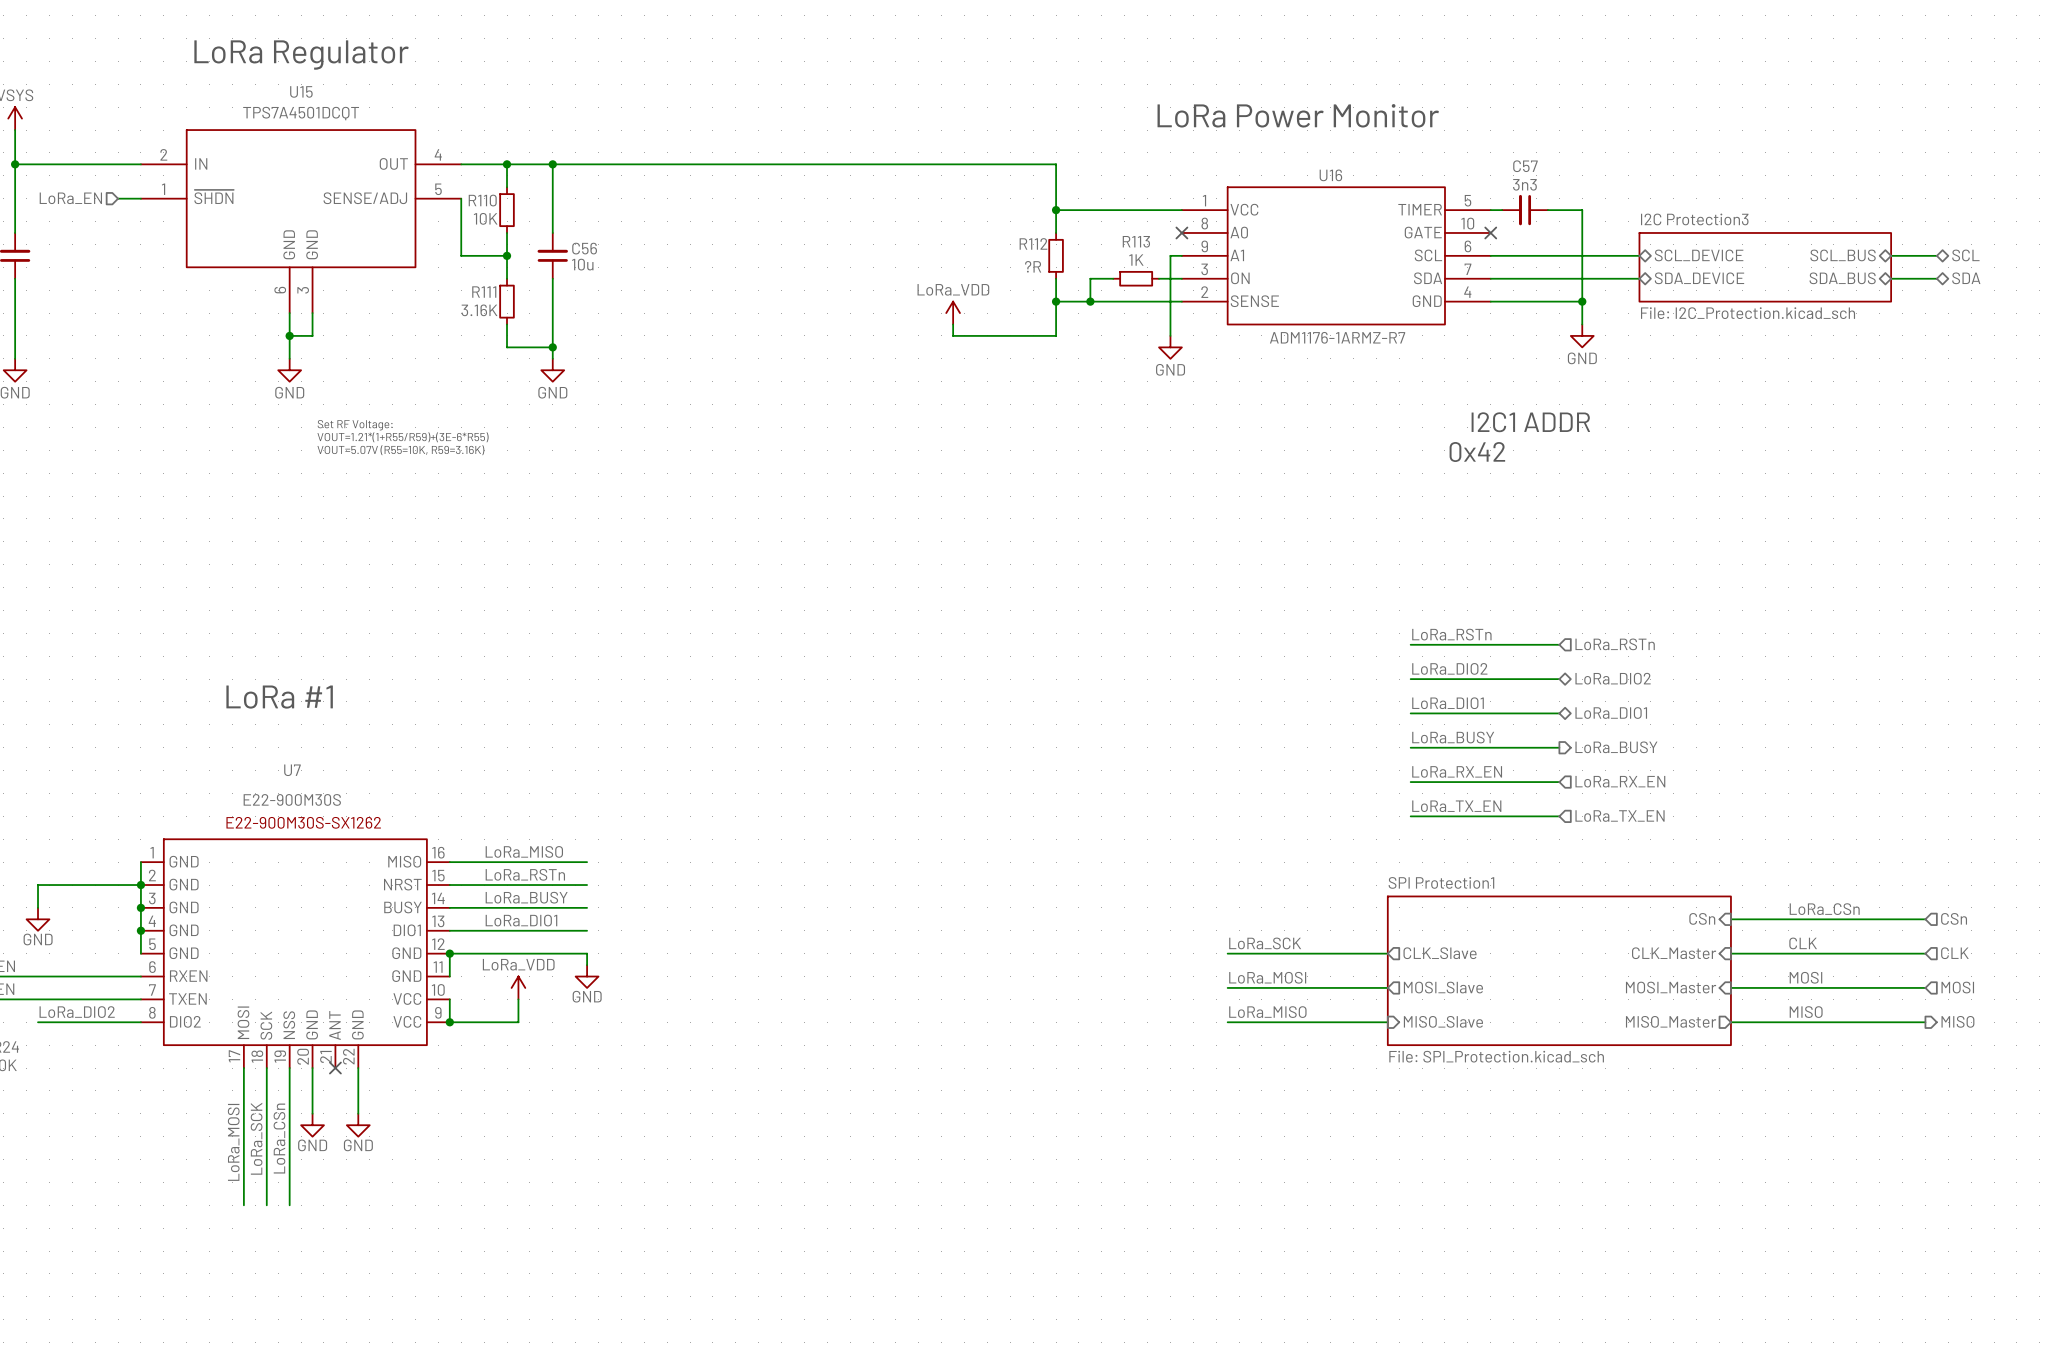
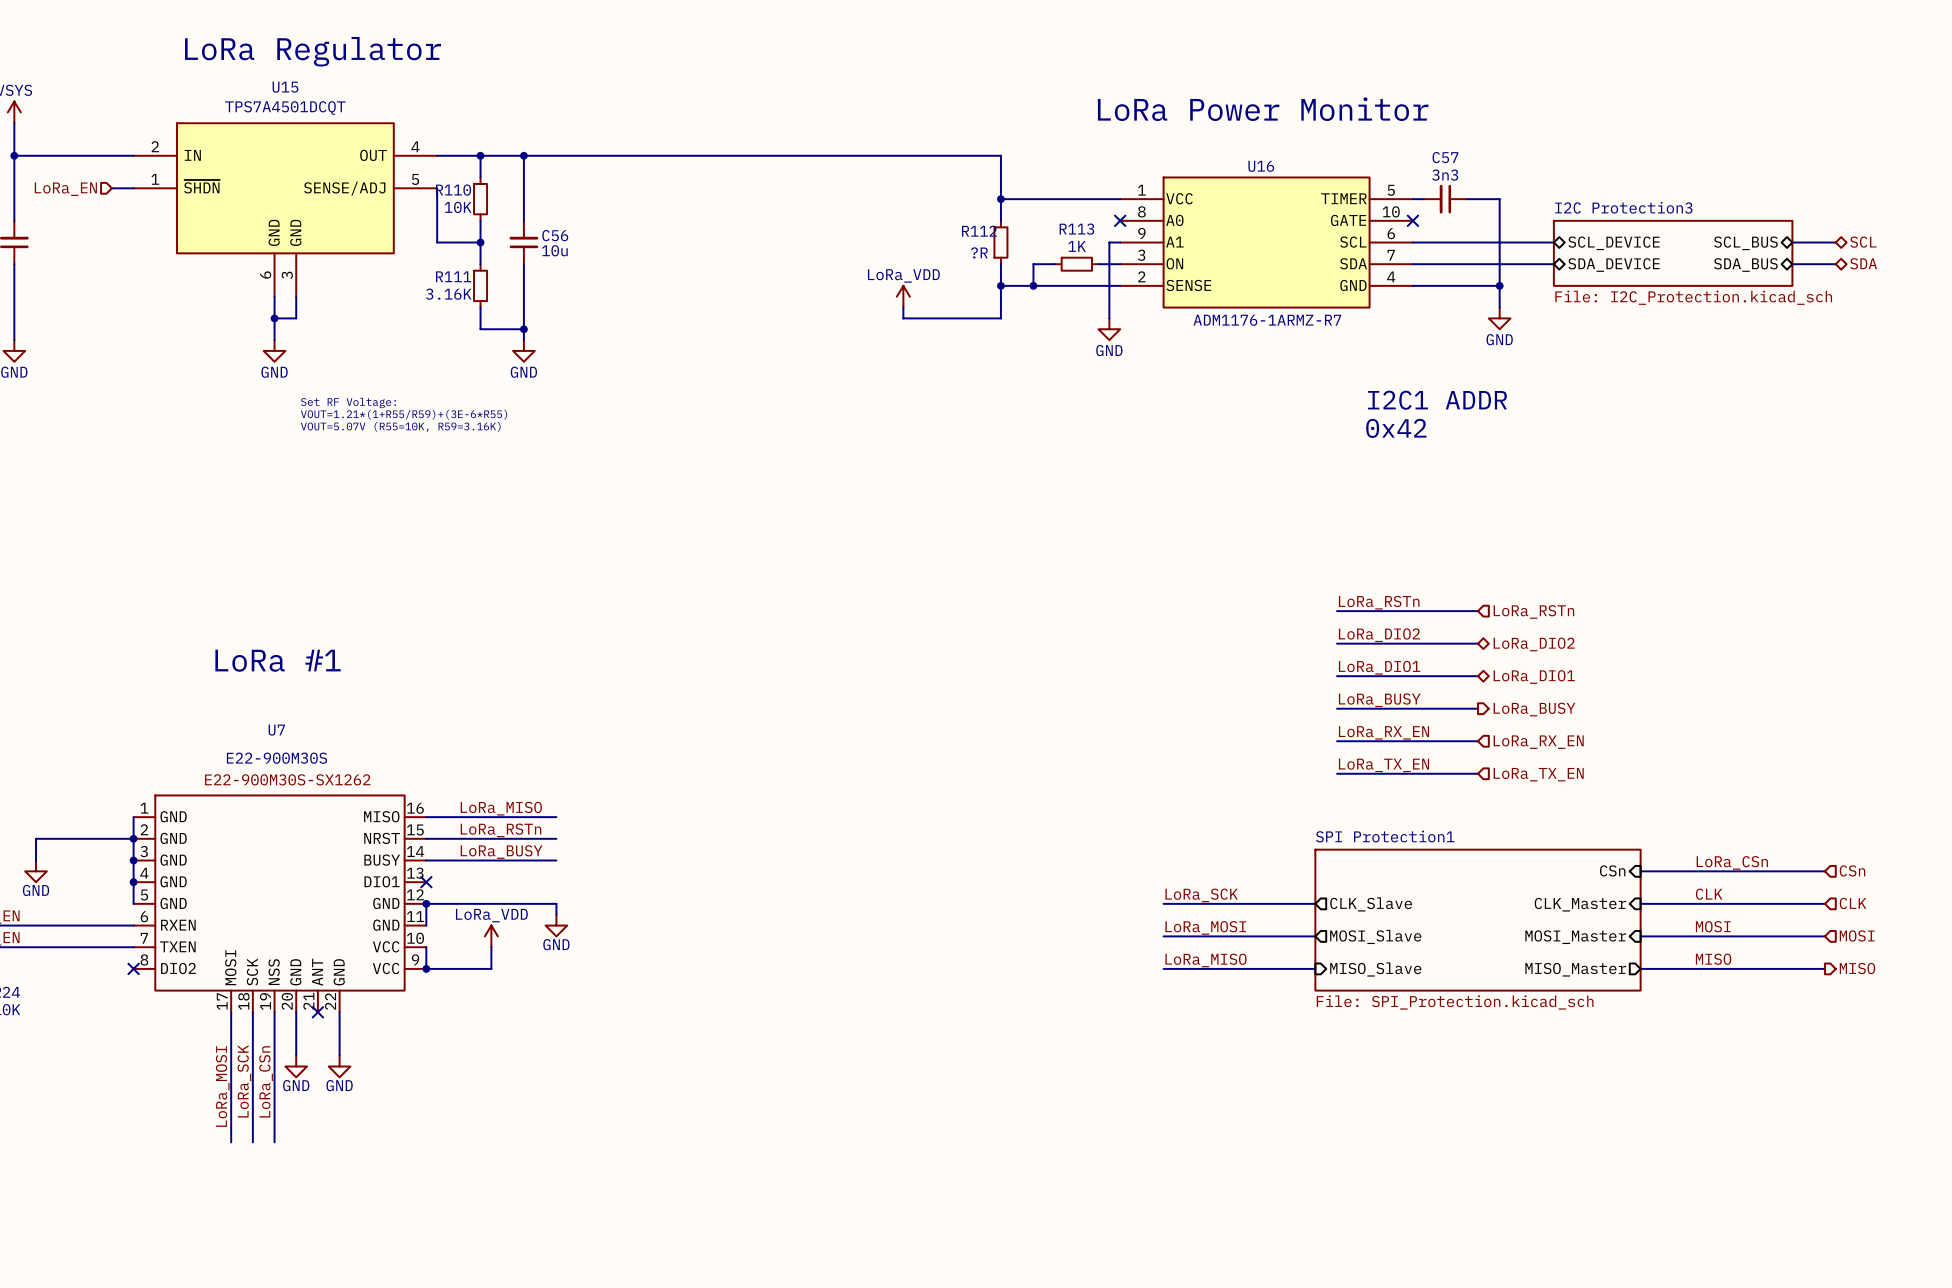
label: LoRa_DIO1 (521, 920) -> none
wire: (449, 930) (587, 930) -> none
no-connect mark: none -> (426, 882)
label: LoRa_DIO2 (77, 1012) -> none
wire: (38, 1022) (140, 1022) -> none
no-connect mark: none -> (133, 968)

